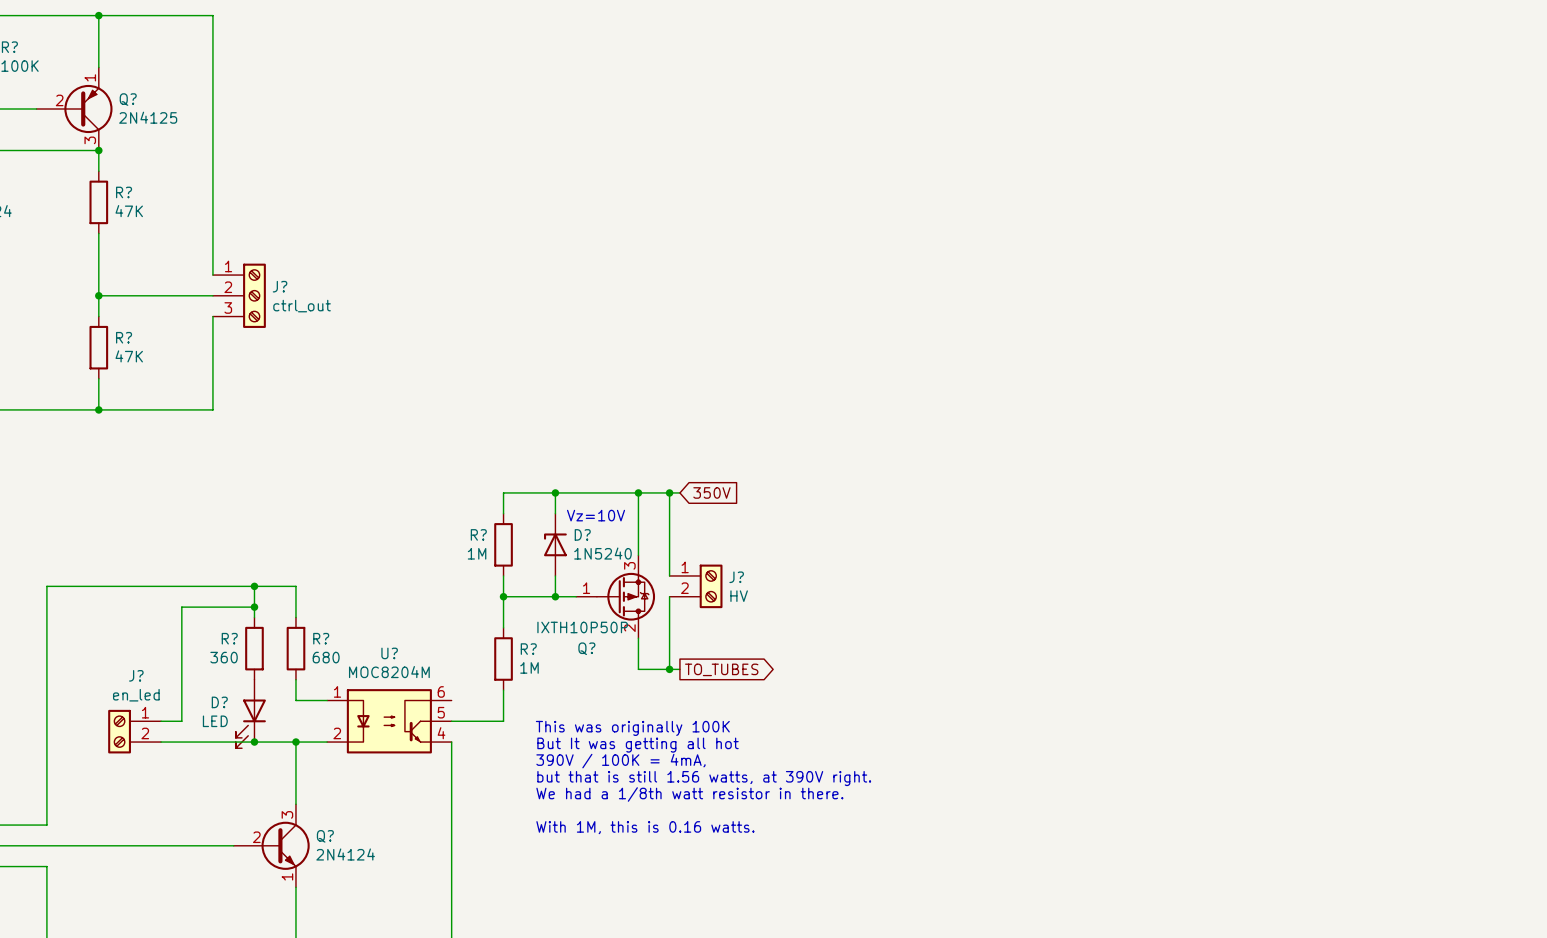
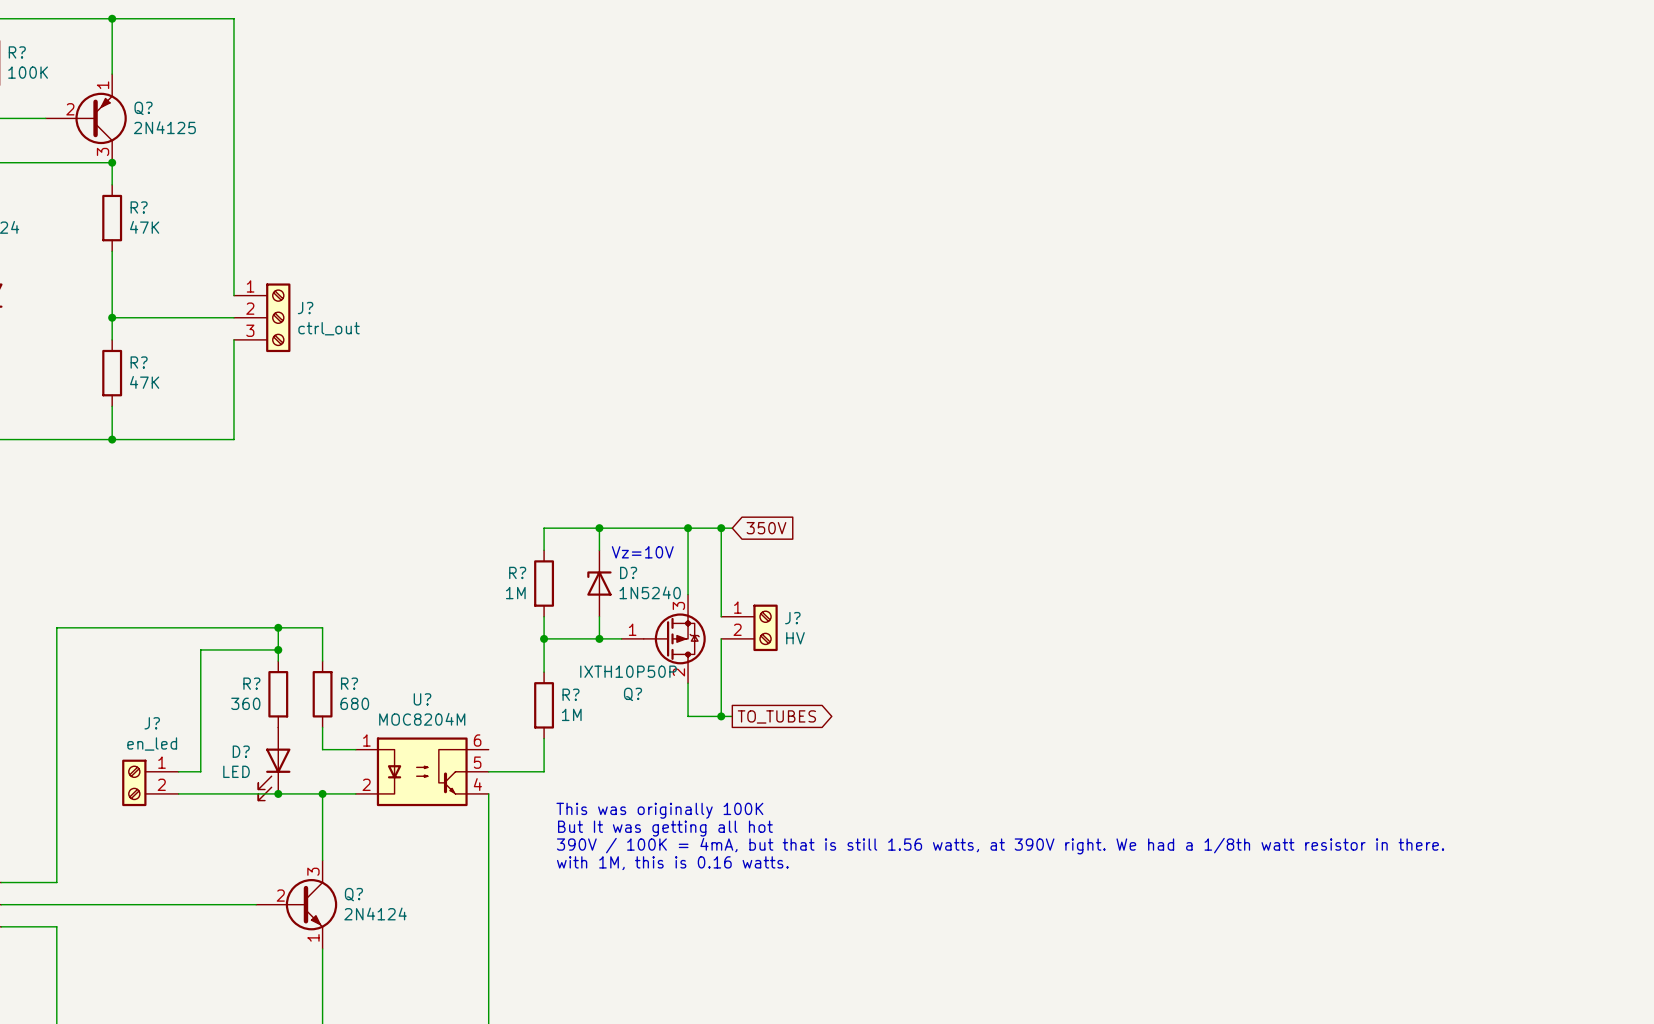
text position: This was originally 100K (632, 728) -> This was originally 100K (659, 810)
text position: But It was getting all hot (638, 745) -> But It was getting all hot (665, 828)
text: 390V / 100K = 4mA, (620, 761) -> none
text: but that is still 1.56 watts, at 390V right. (704, 778) -> 390V / 100K = 4mA, but that is still 1.56 watts, at 390V right. We had a 1/8th watt resistor in there. (1000, 846)
text: We had a 1/8th watt resistor in there. (689, 794) -> none
text: With 1M, this is 0.16 watts. (645, 827) -> with 1M, this is 0.16 watts. (672, 863)

